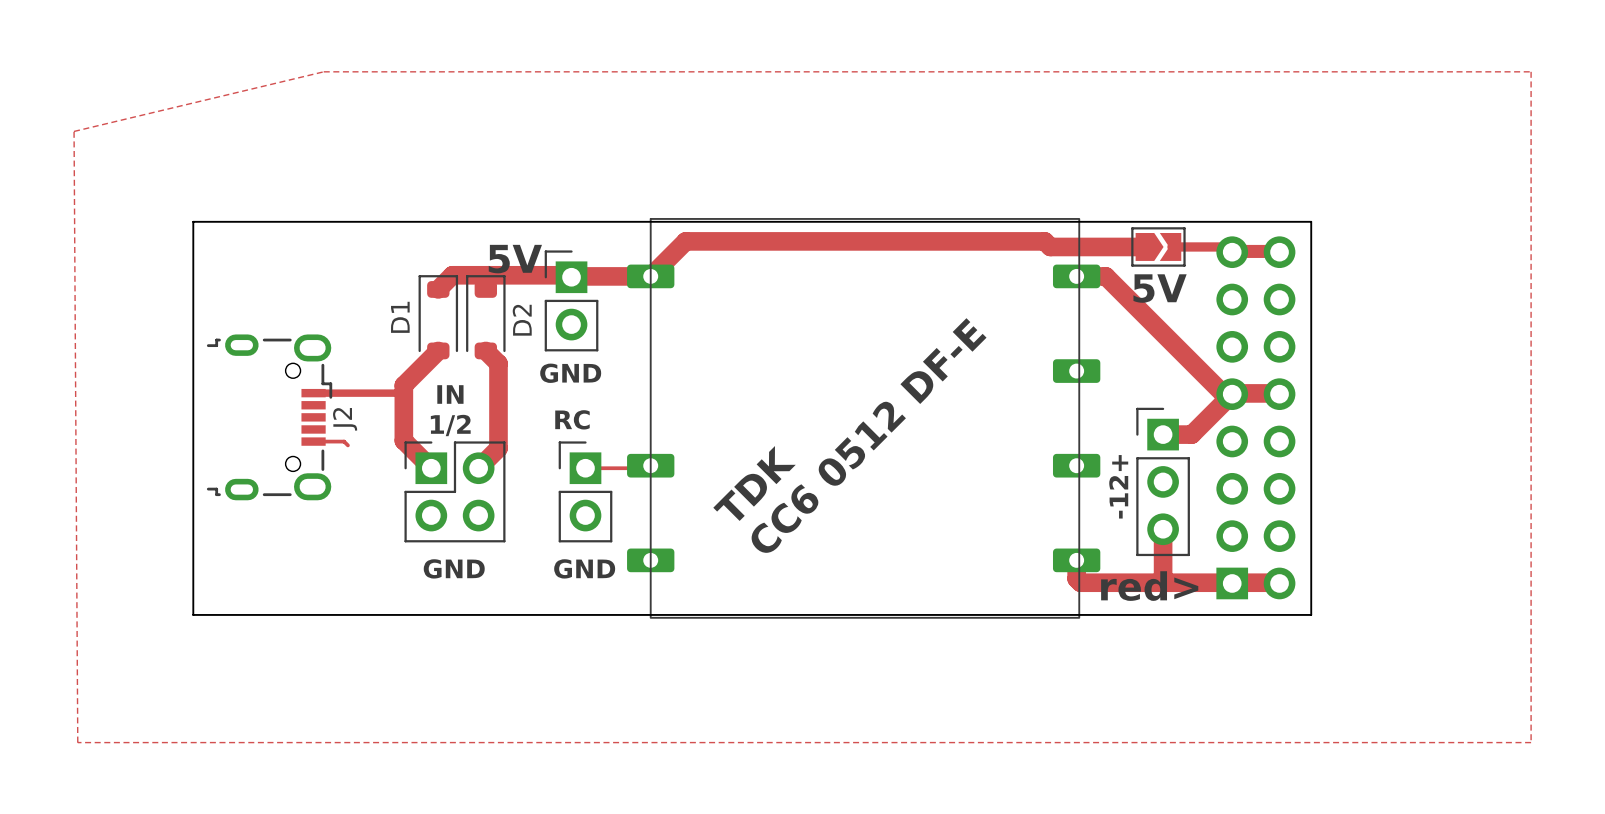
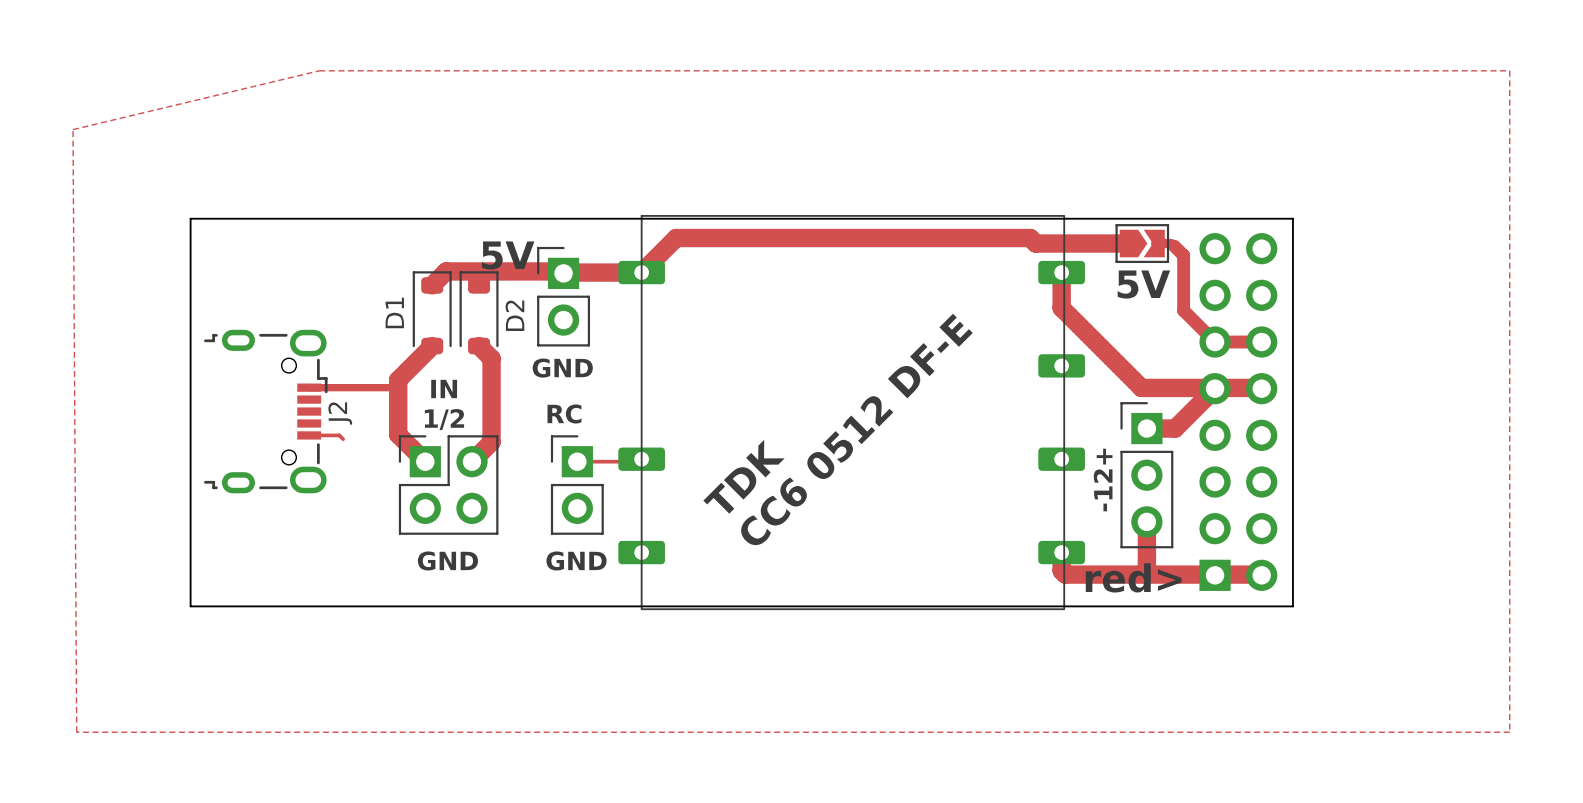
track: (1188, 246) (1229, 246) (1234, 251) (1281, 251) -> (1171, 243) (1183, 255) (1183, 310) (1215, 342) (1261, 342)
track: (1076, 276) (1105, 276) (1222, 393) -> (1061, 272) (1061, 308) (1141, 387) (1205, 387)

